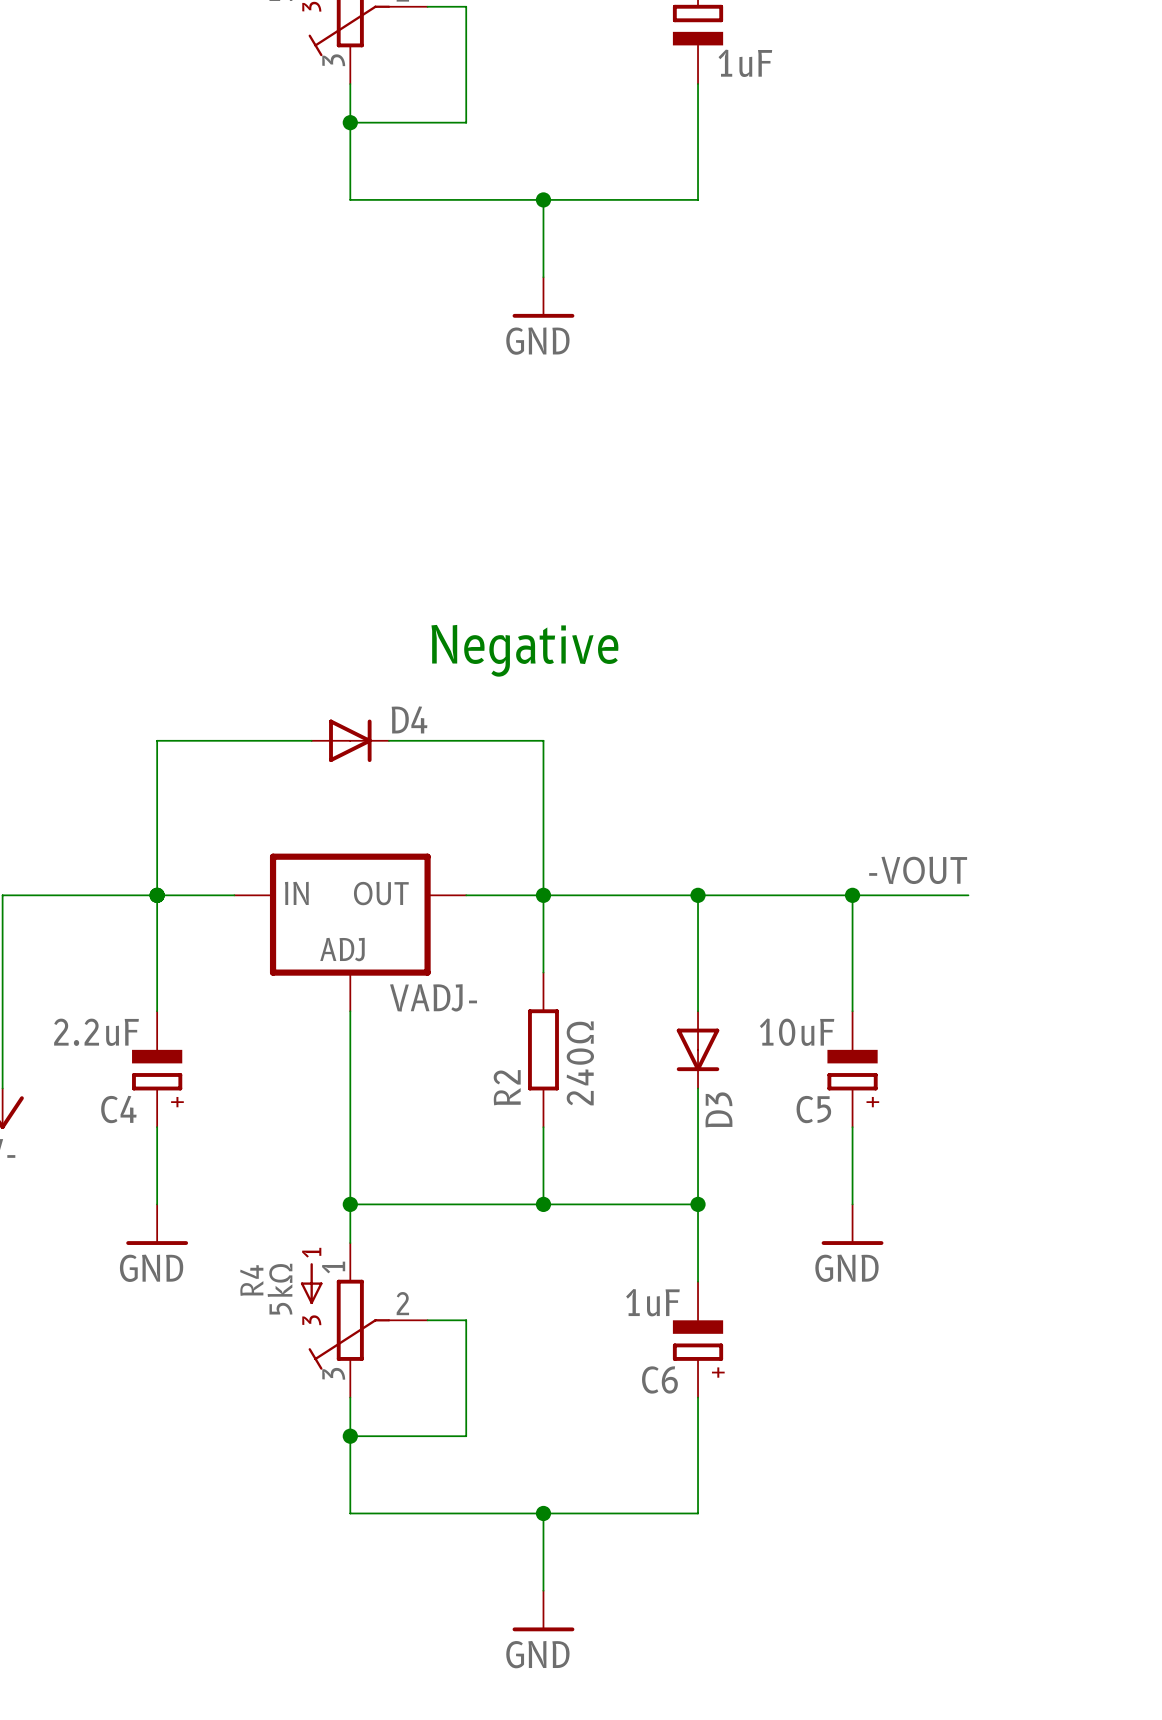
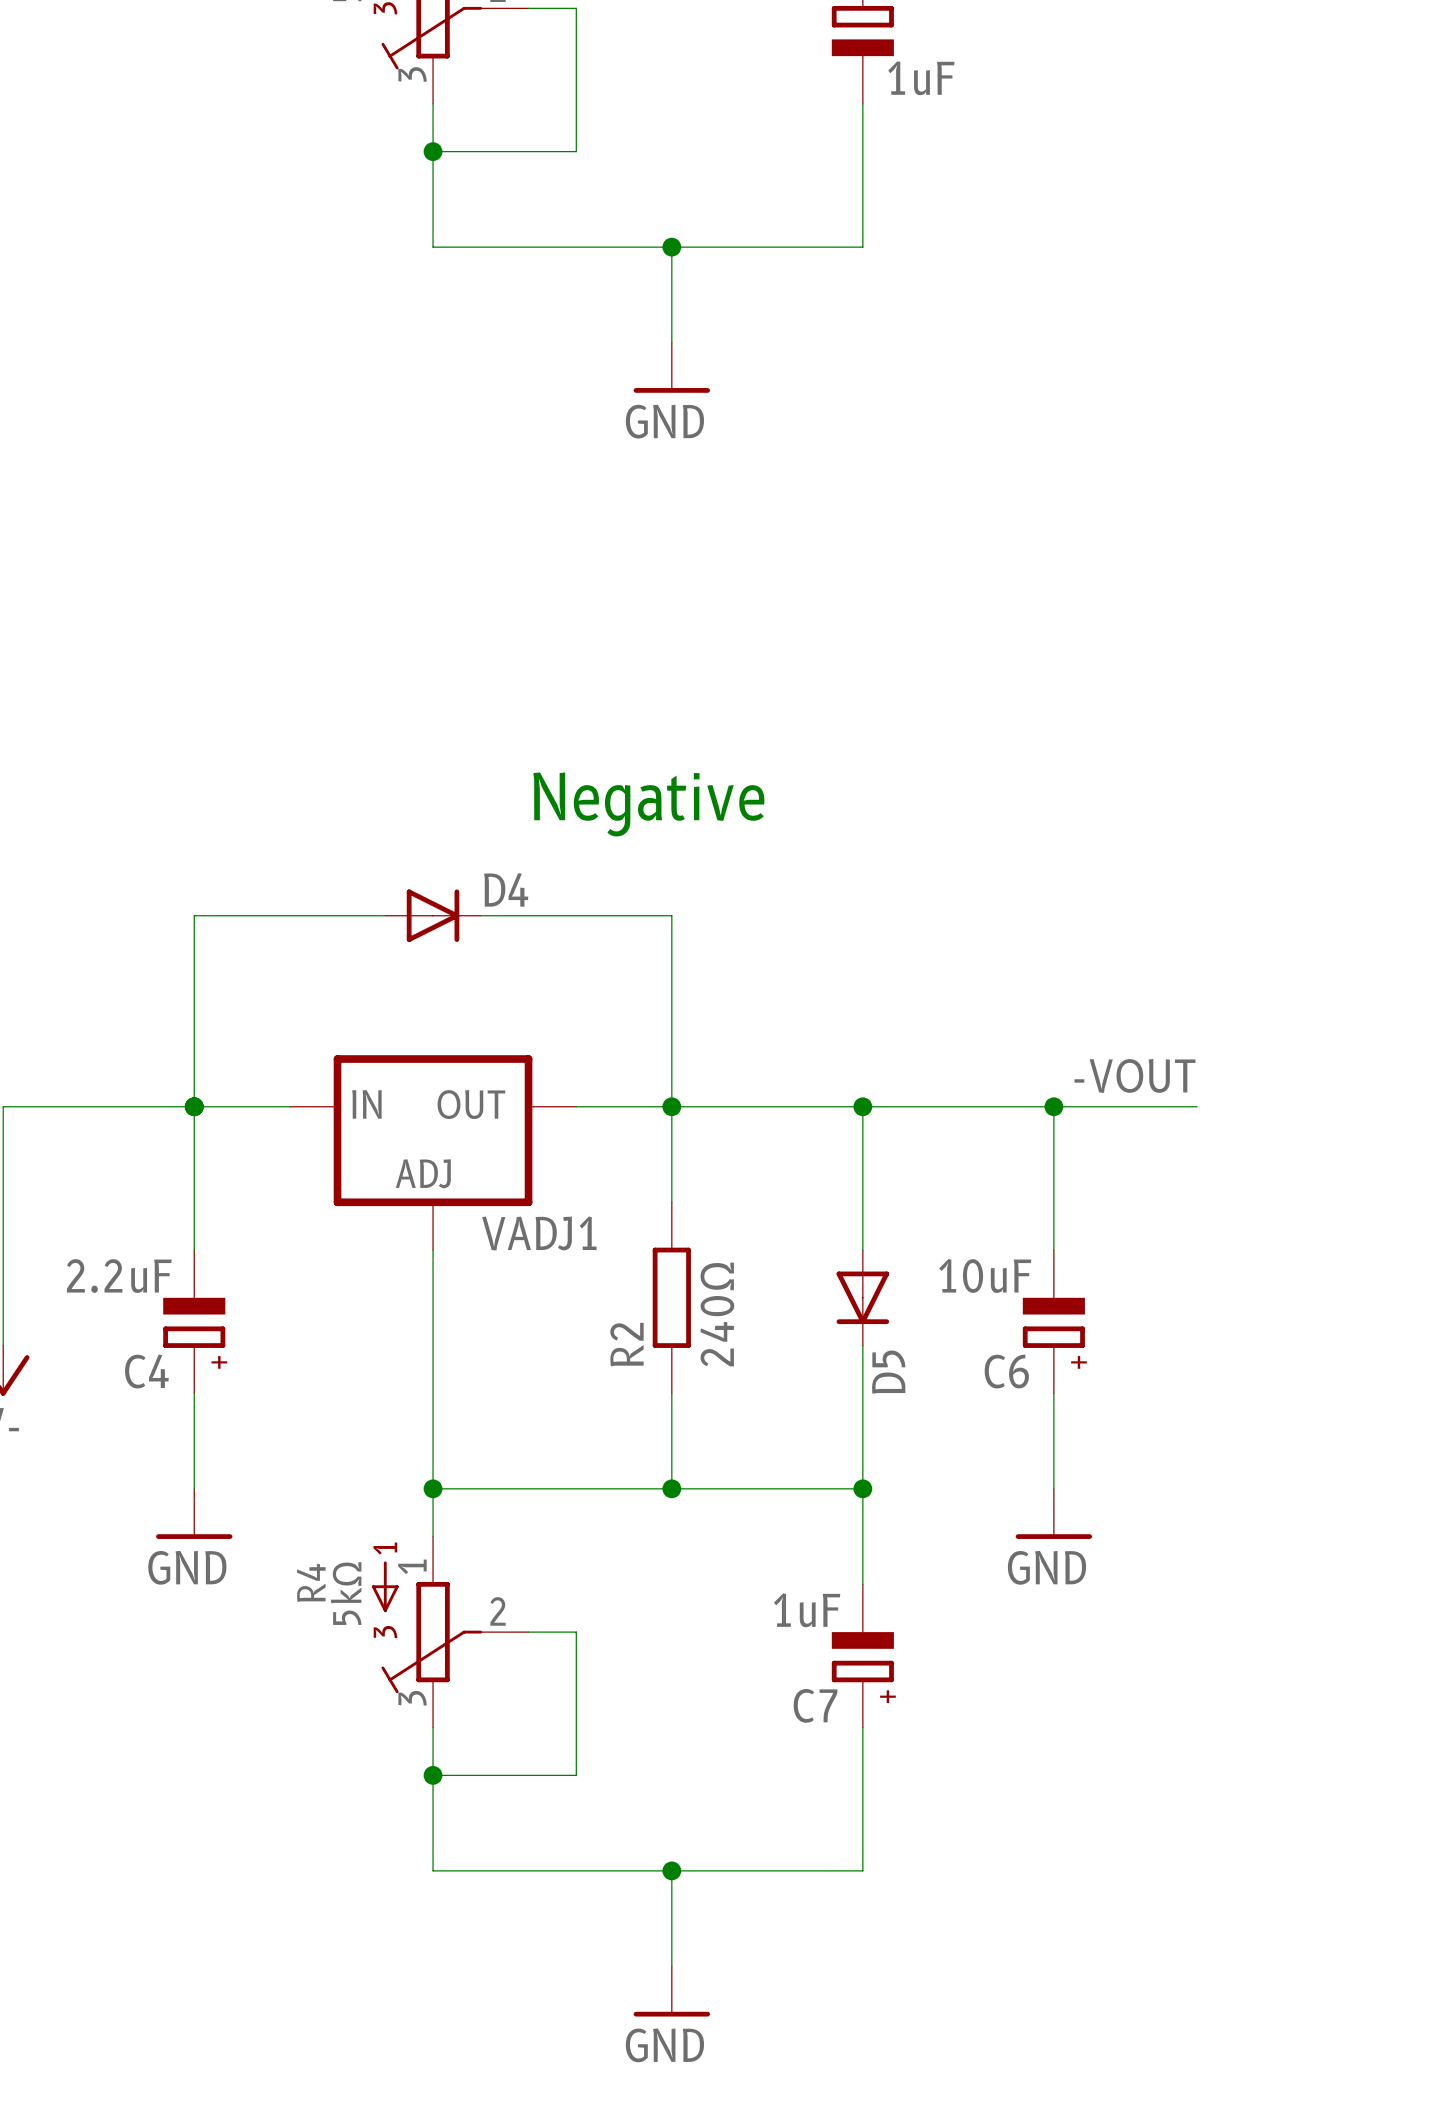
VADJ- name: VADJ- (433, 997) -> VADJ1 (539, 1233)
D3 name: D3 (718, 1109) -> D5 (888, 1372)
C5 name: C5 (813, 1109) -> C6 (1006, 1371)
C6 name: C6 (659, 1379) -> C7 (815, 1705)

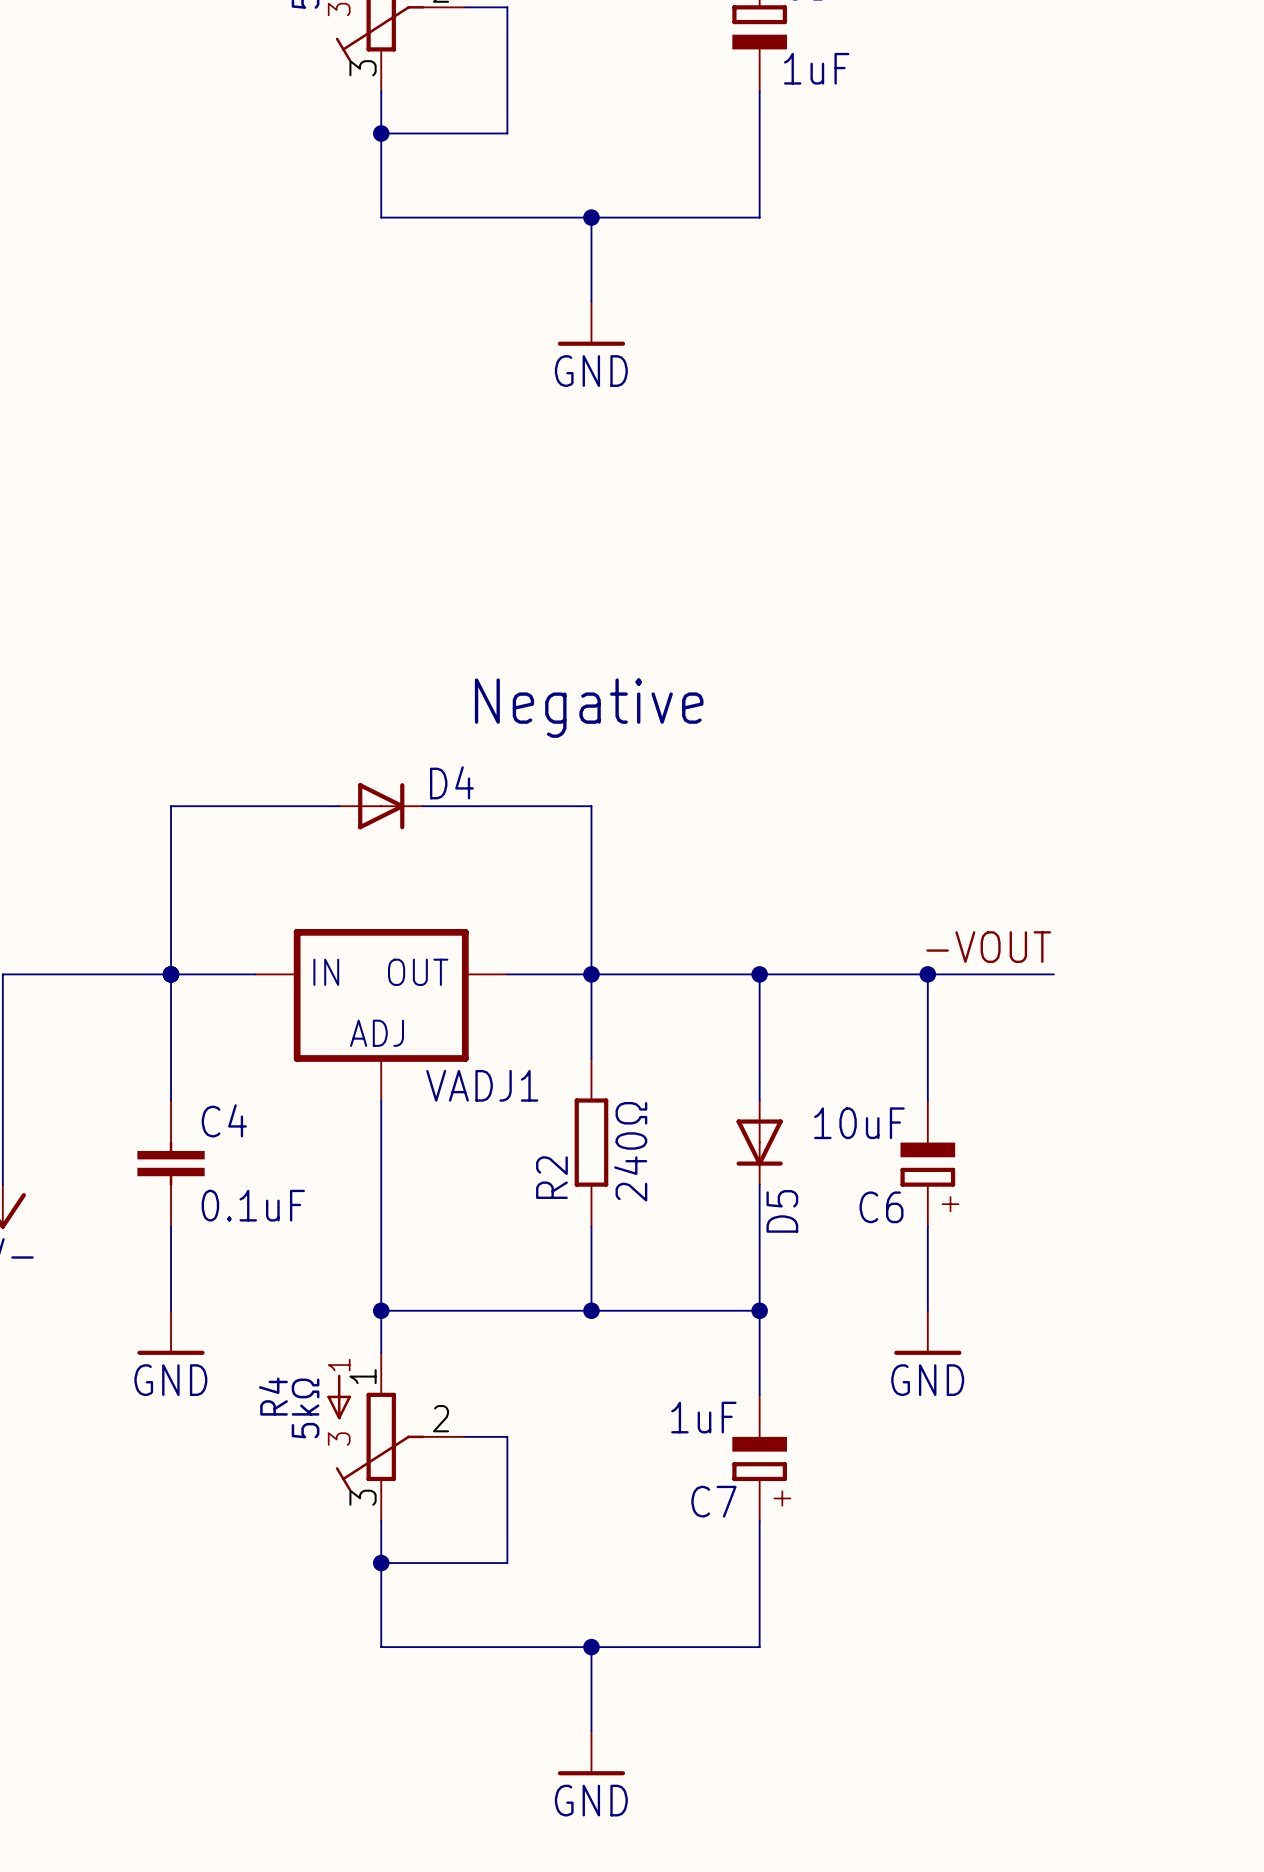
C4 symbol: [163, 1250, 226, 1394] -> [137, 1100, 205, 1227]
C4 value: 2.2uF (119, 1276) -> 0.1uF (253, 1205)
C4 name position: C4 (146, 1371) -> C4 (224, 1120)

